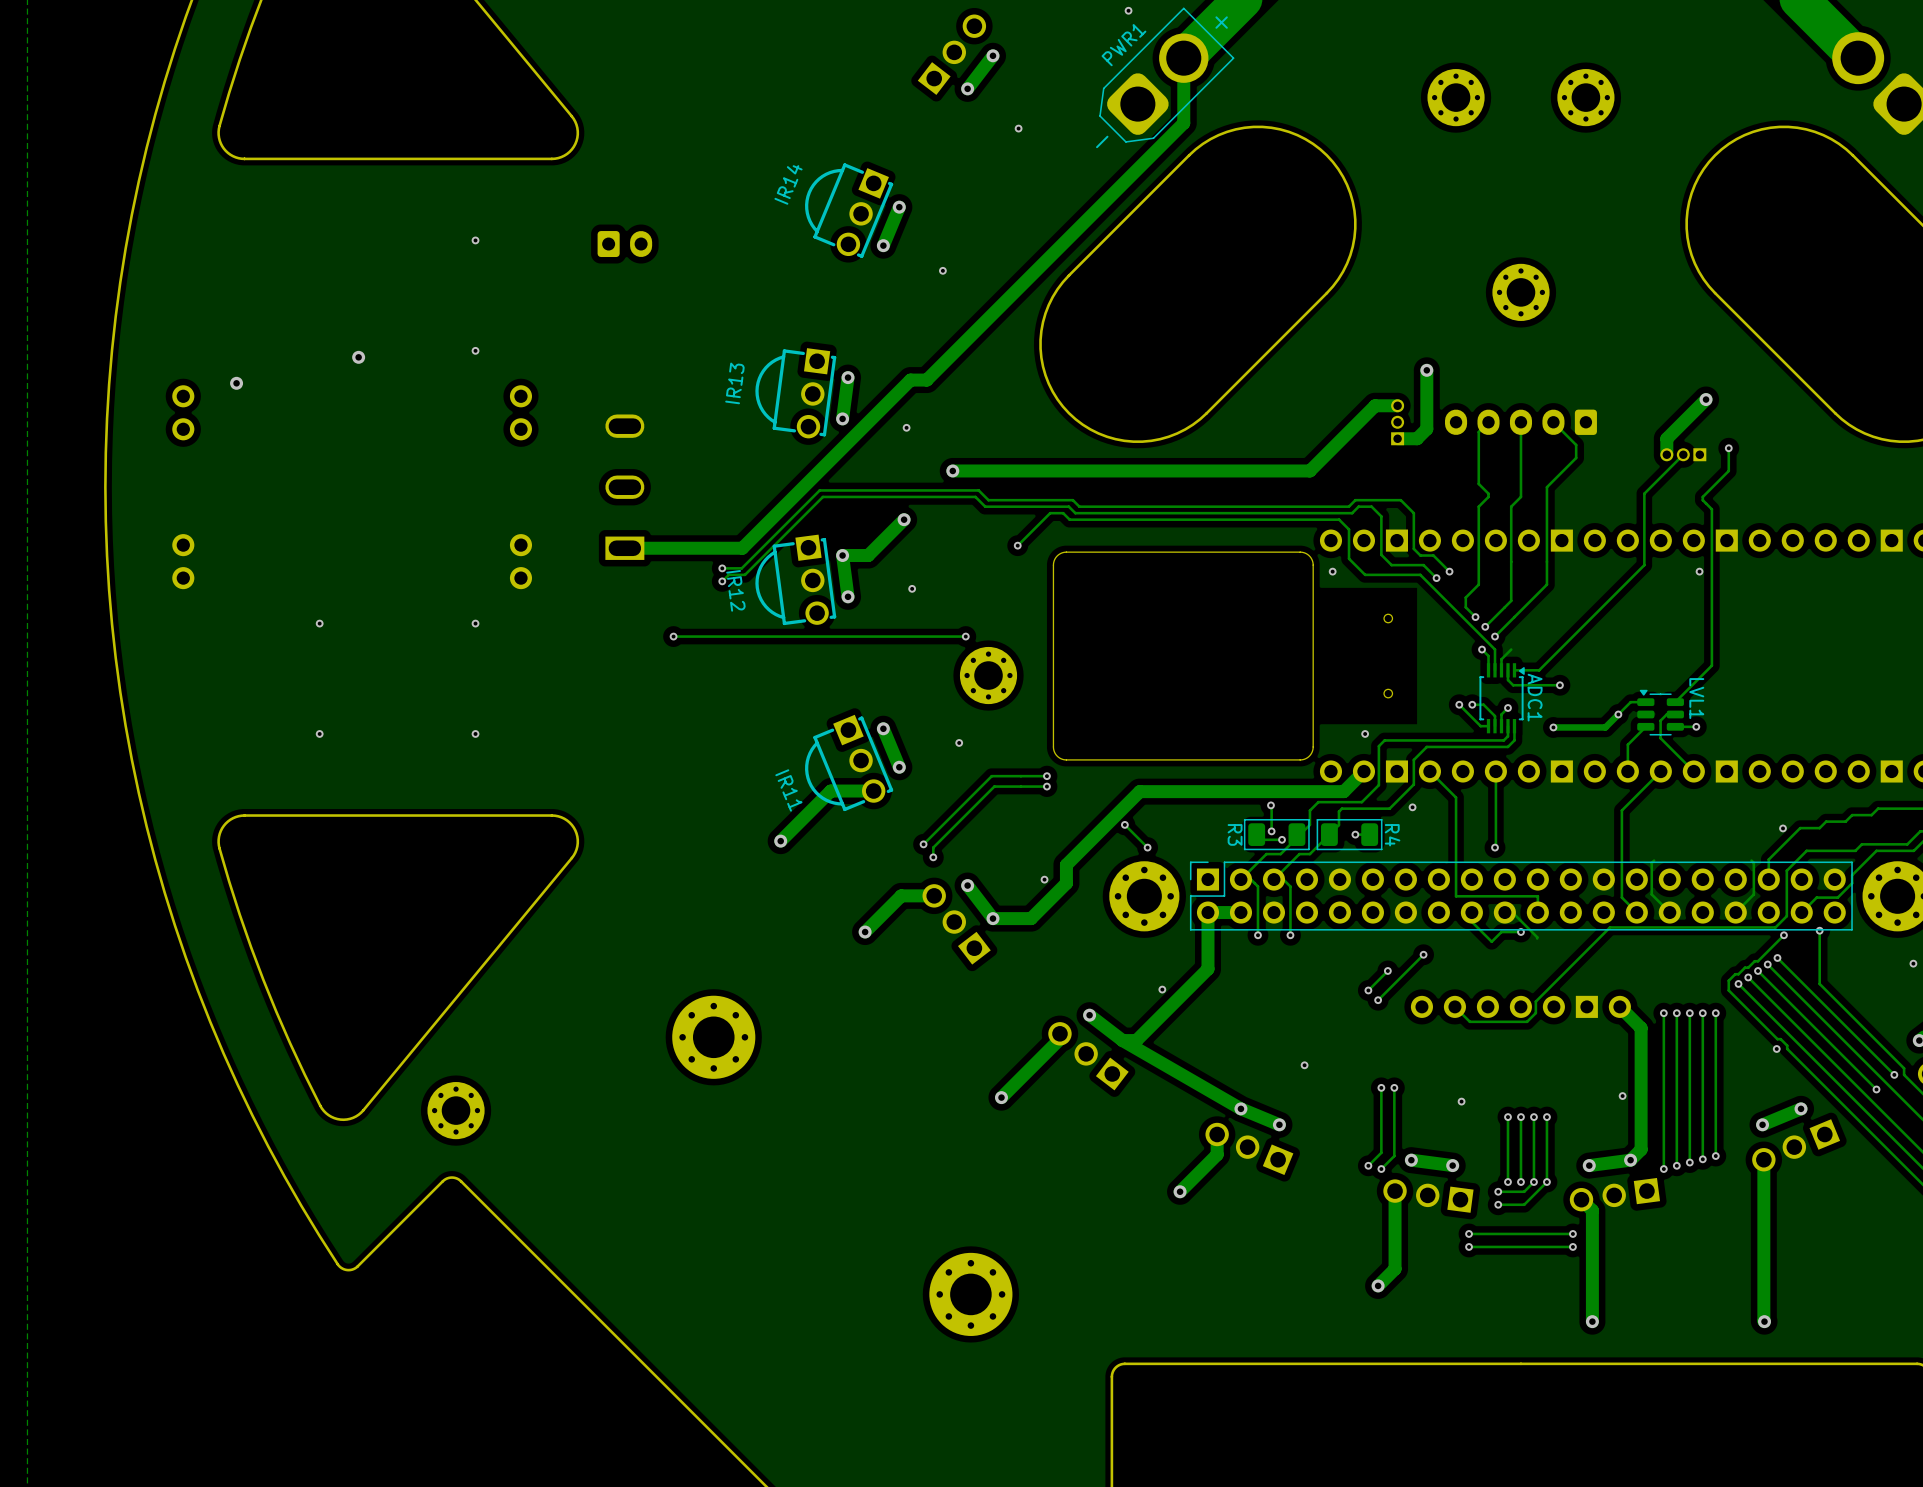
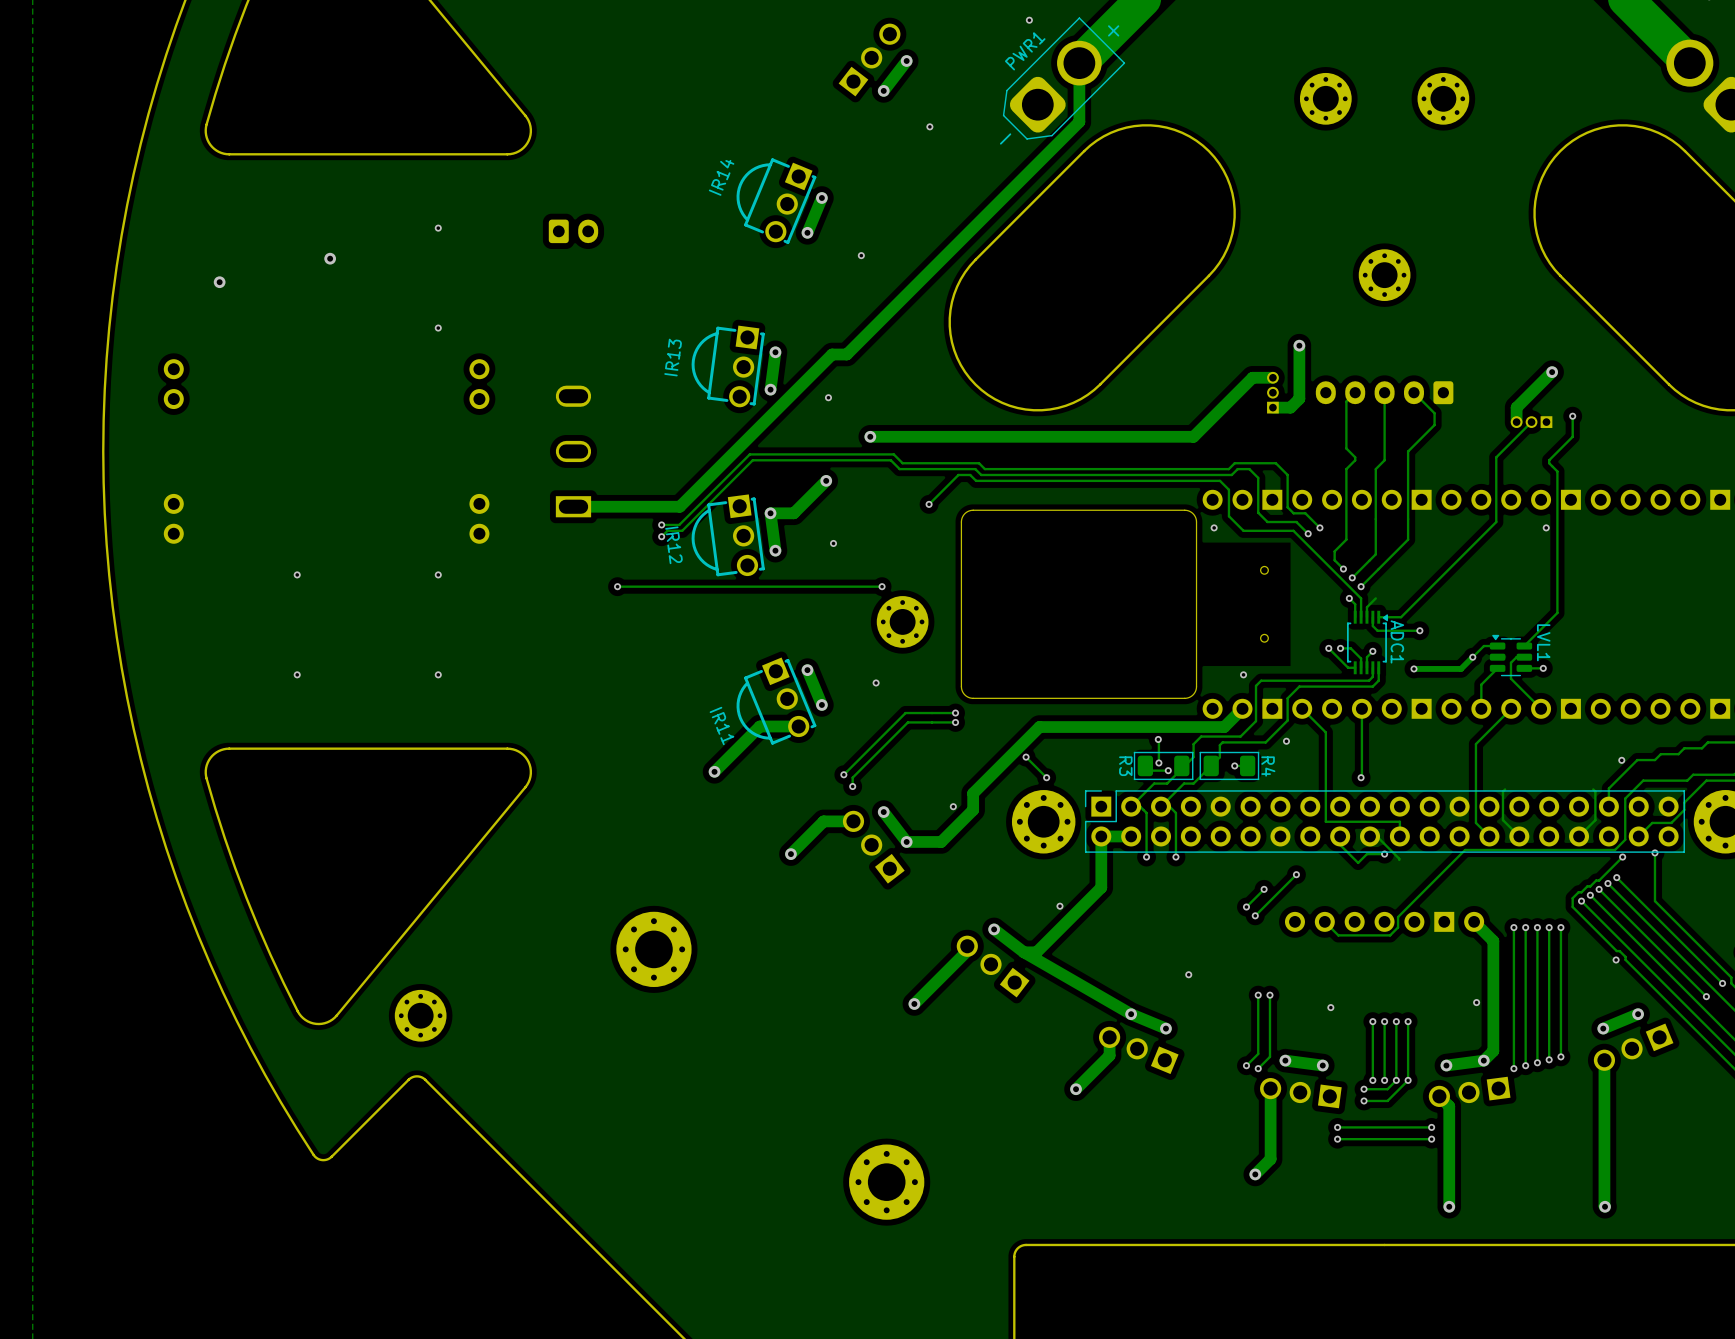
via: none -> (330, 258)
via: none -> (219, 282)
via: (358, 357) -> none
via: (236, 383) -> none

